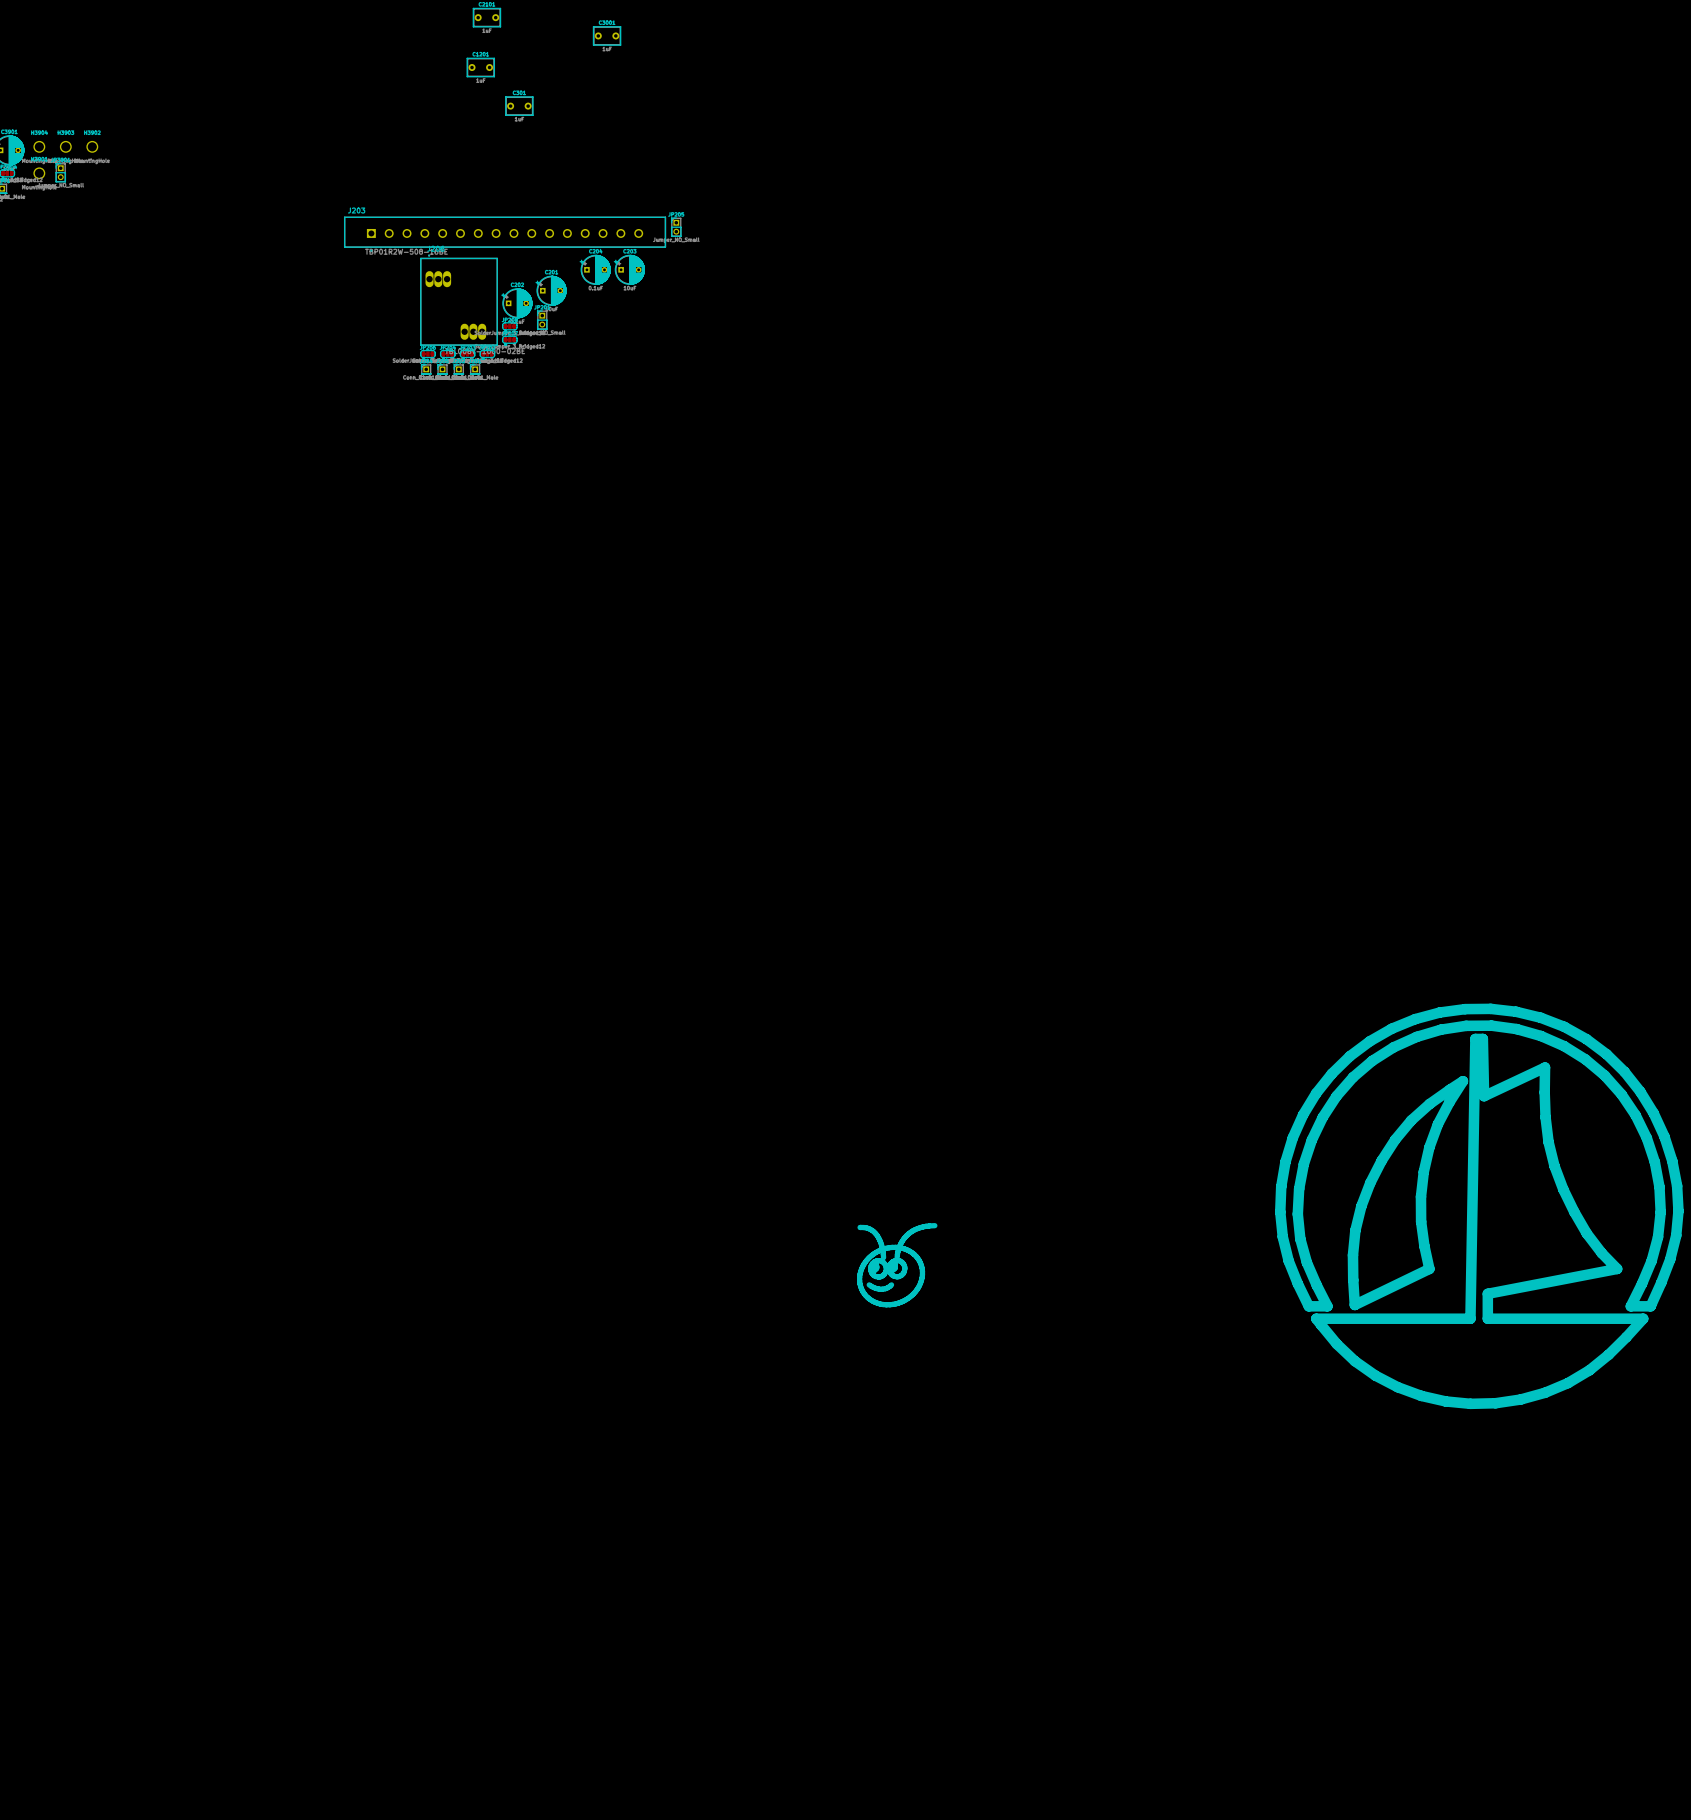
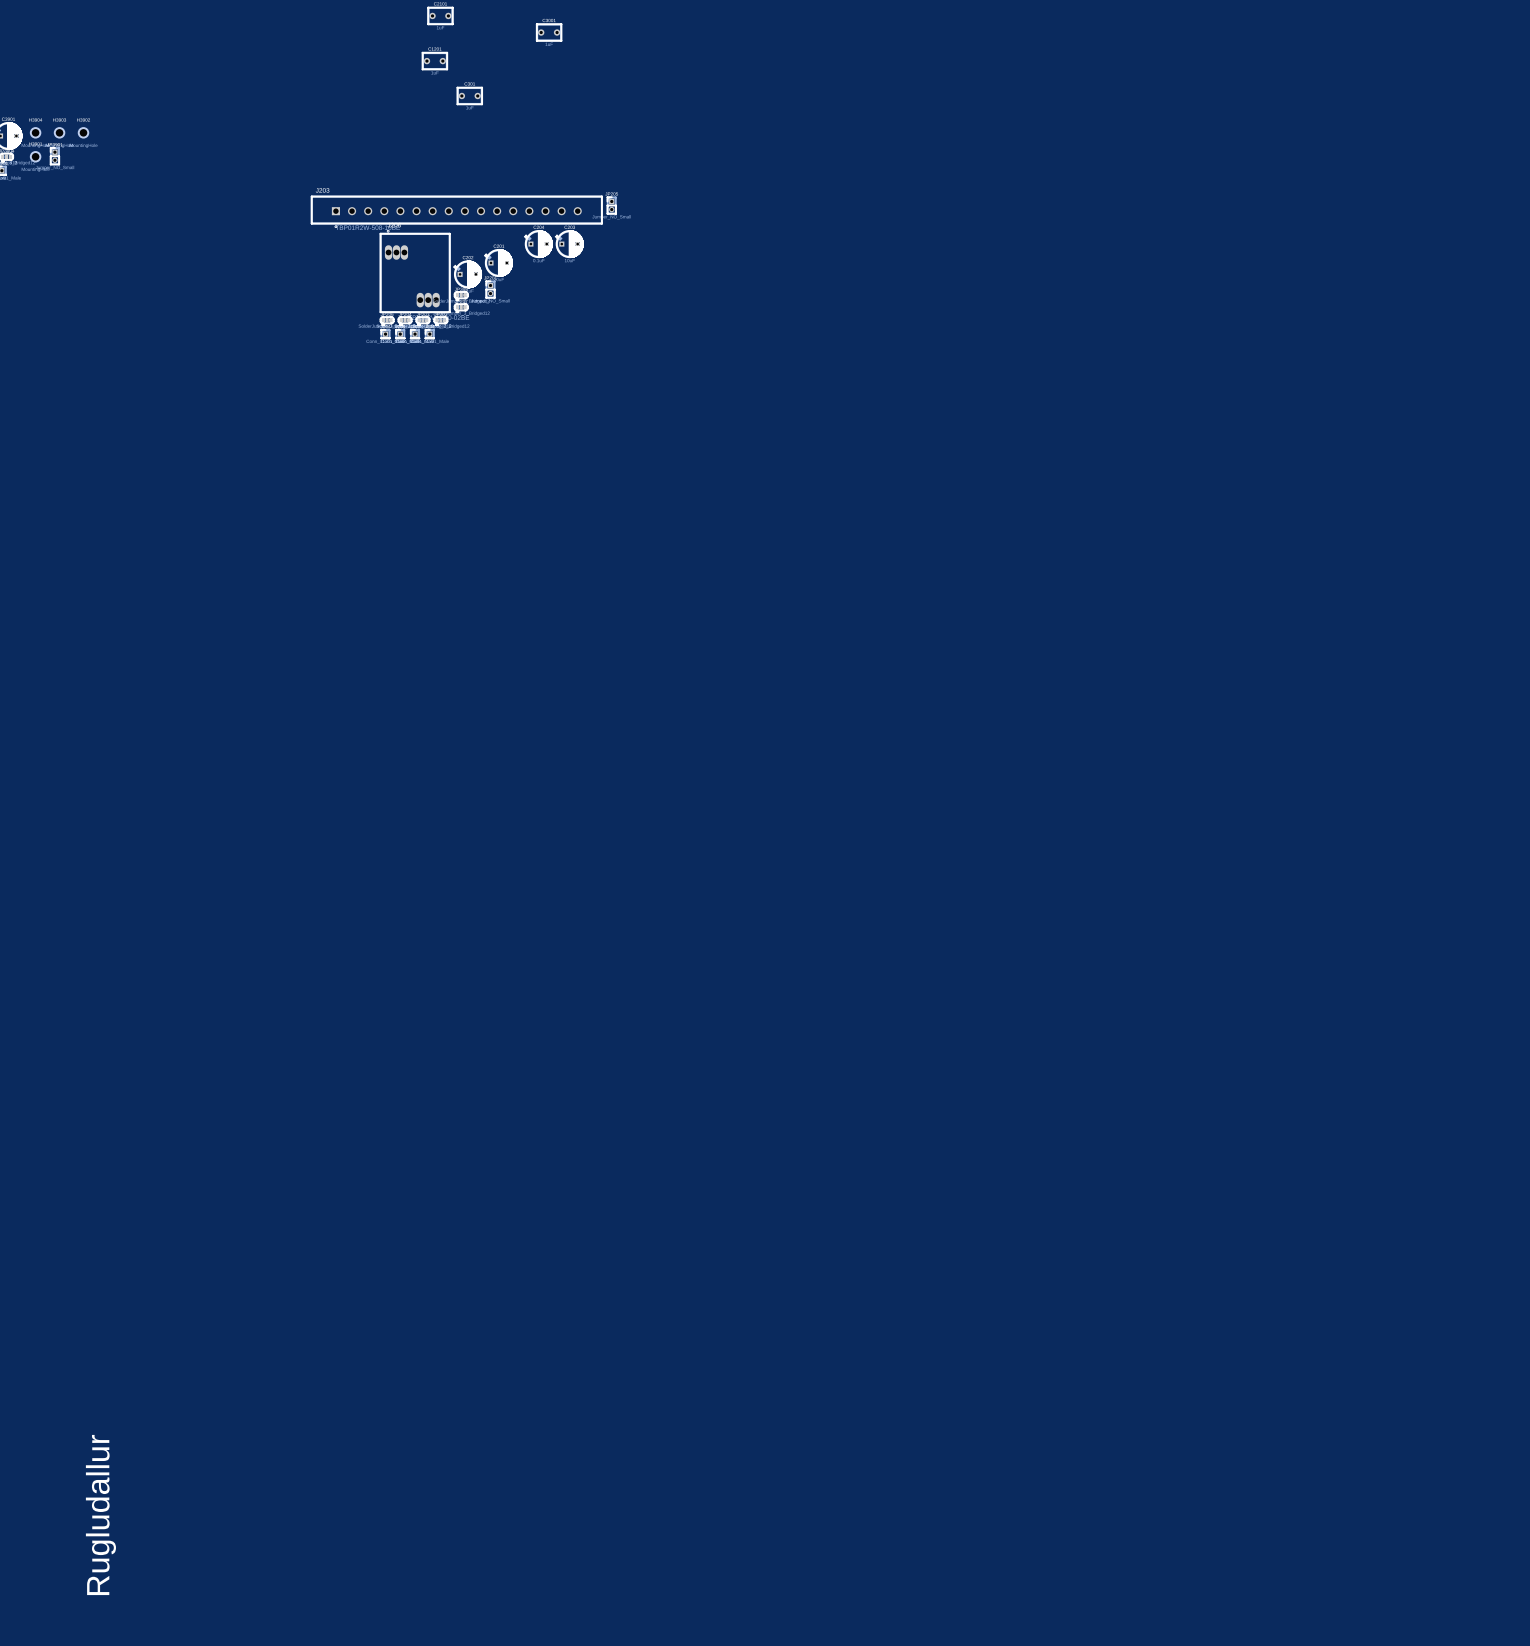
drawing: [1275, 1003, 1684, 1410] -> none
drawing: [856, 1223, 938, 1308] -> none
text: none -> Rugludallur (100, 1514)

